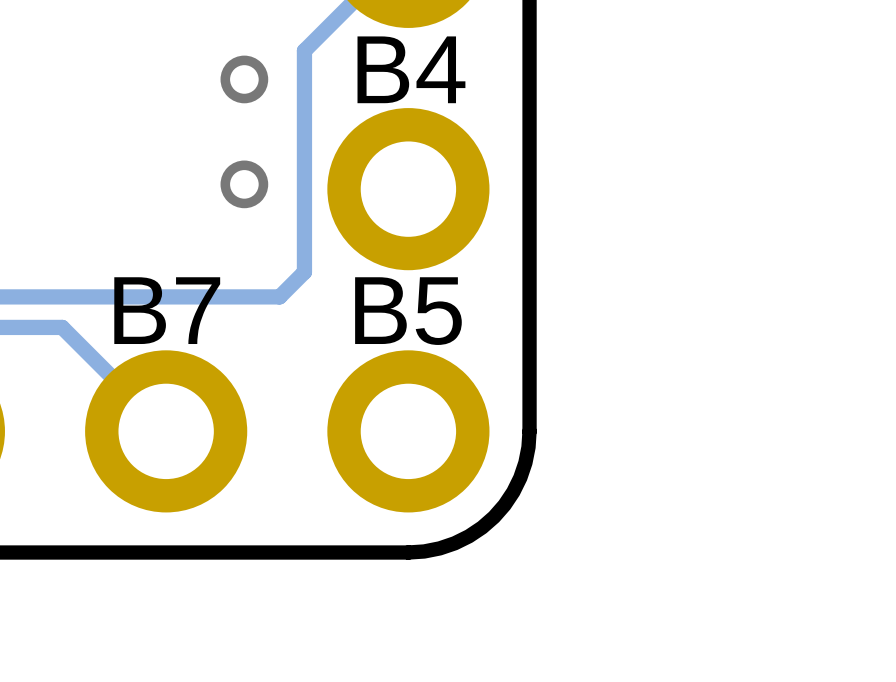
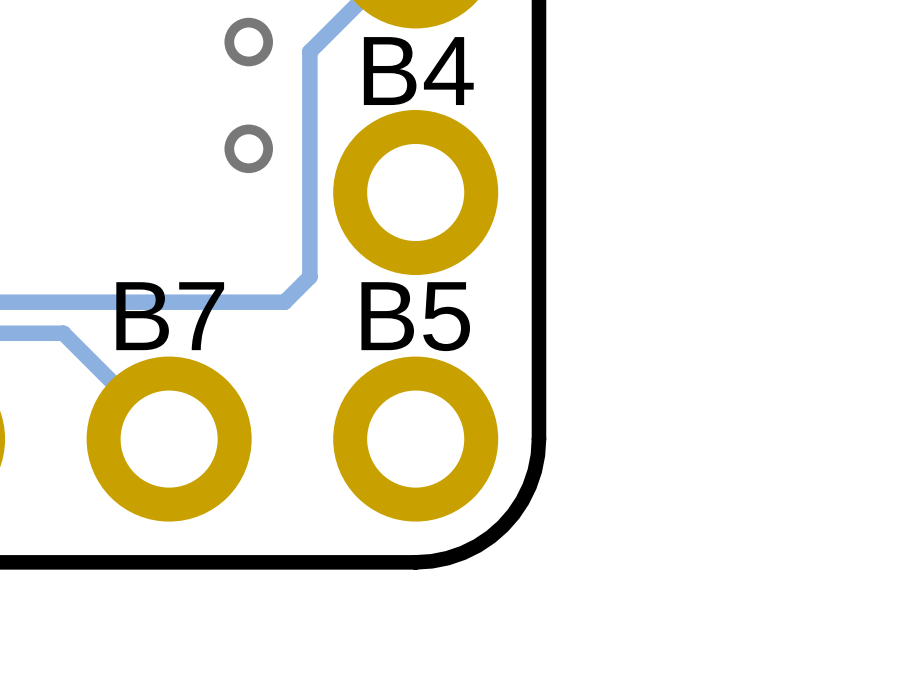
via position: (244, 79) -> (248, 42)
via position: (244, 184) -> (248, 148)

